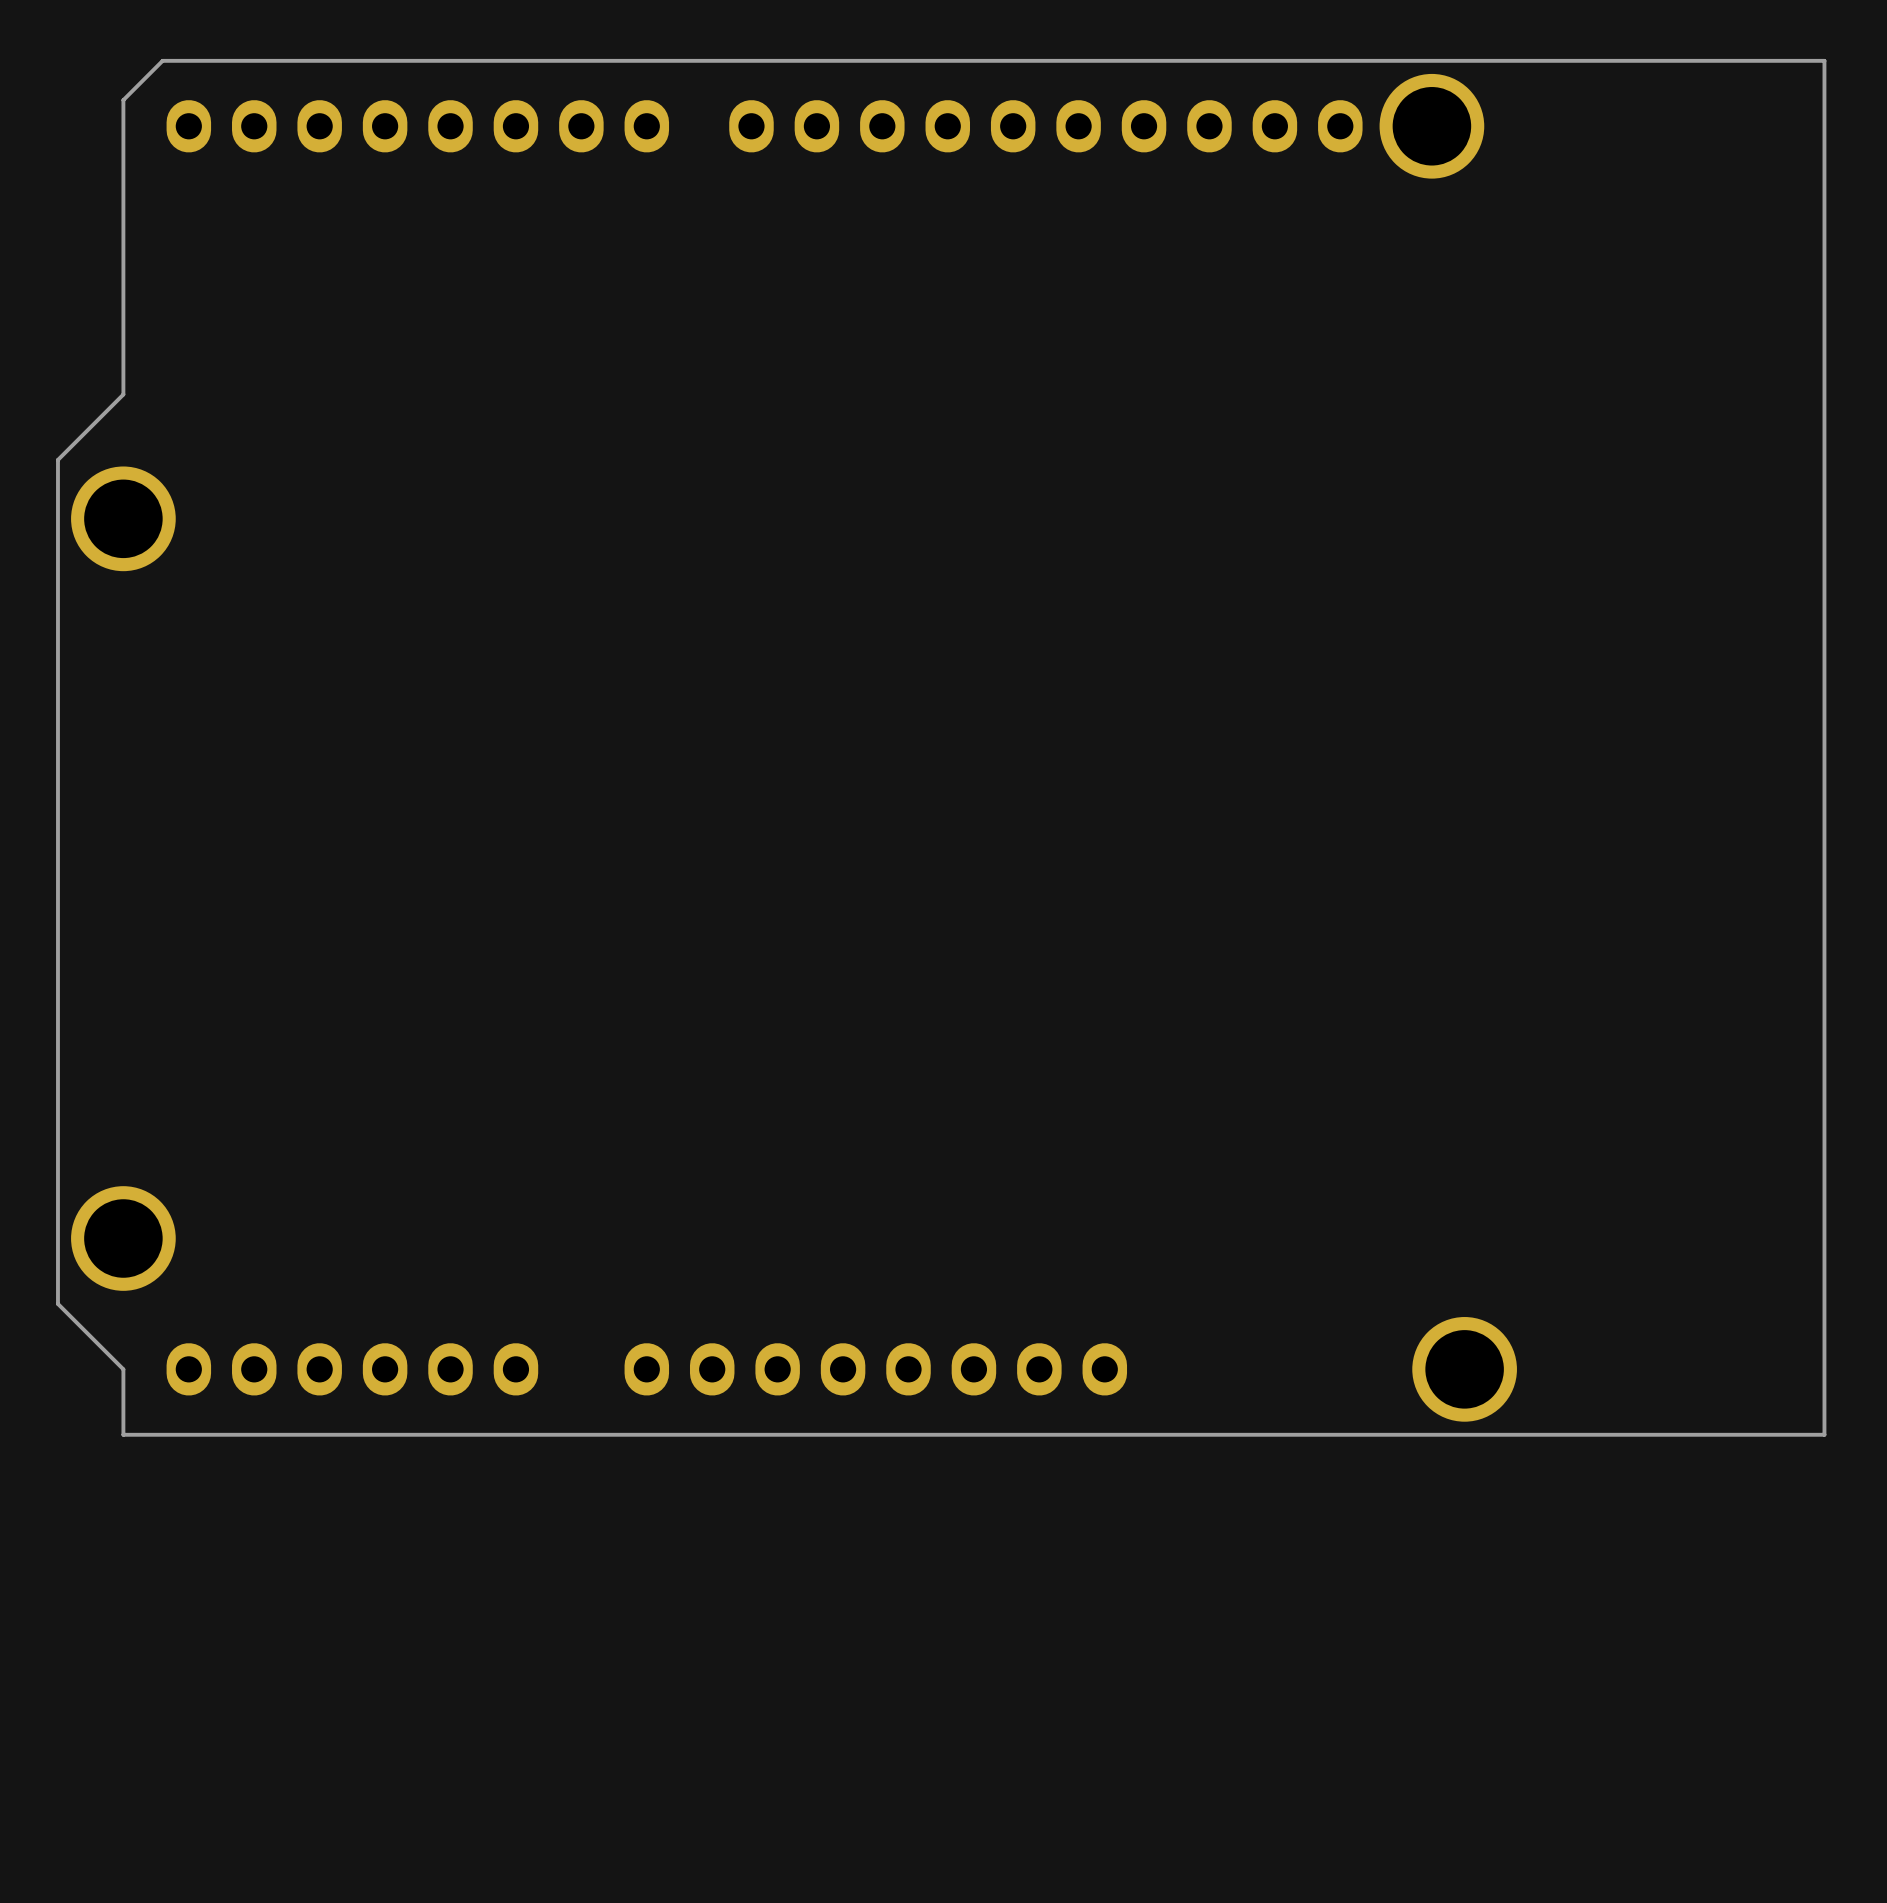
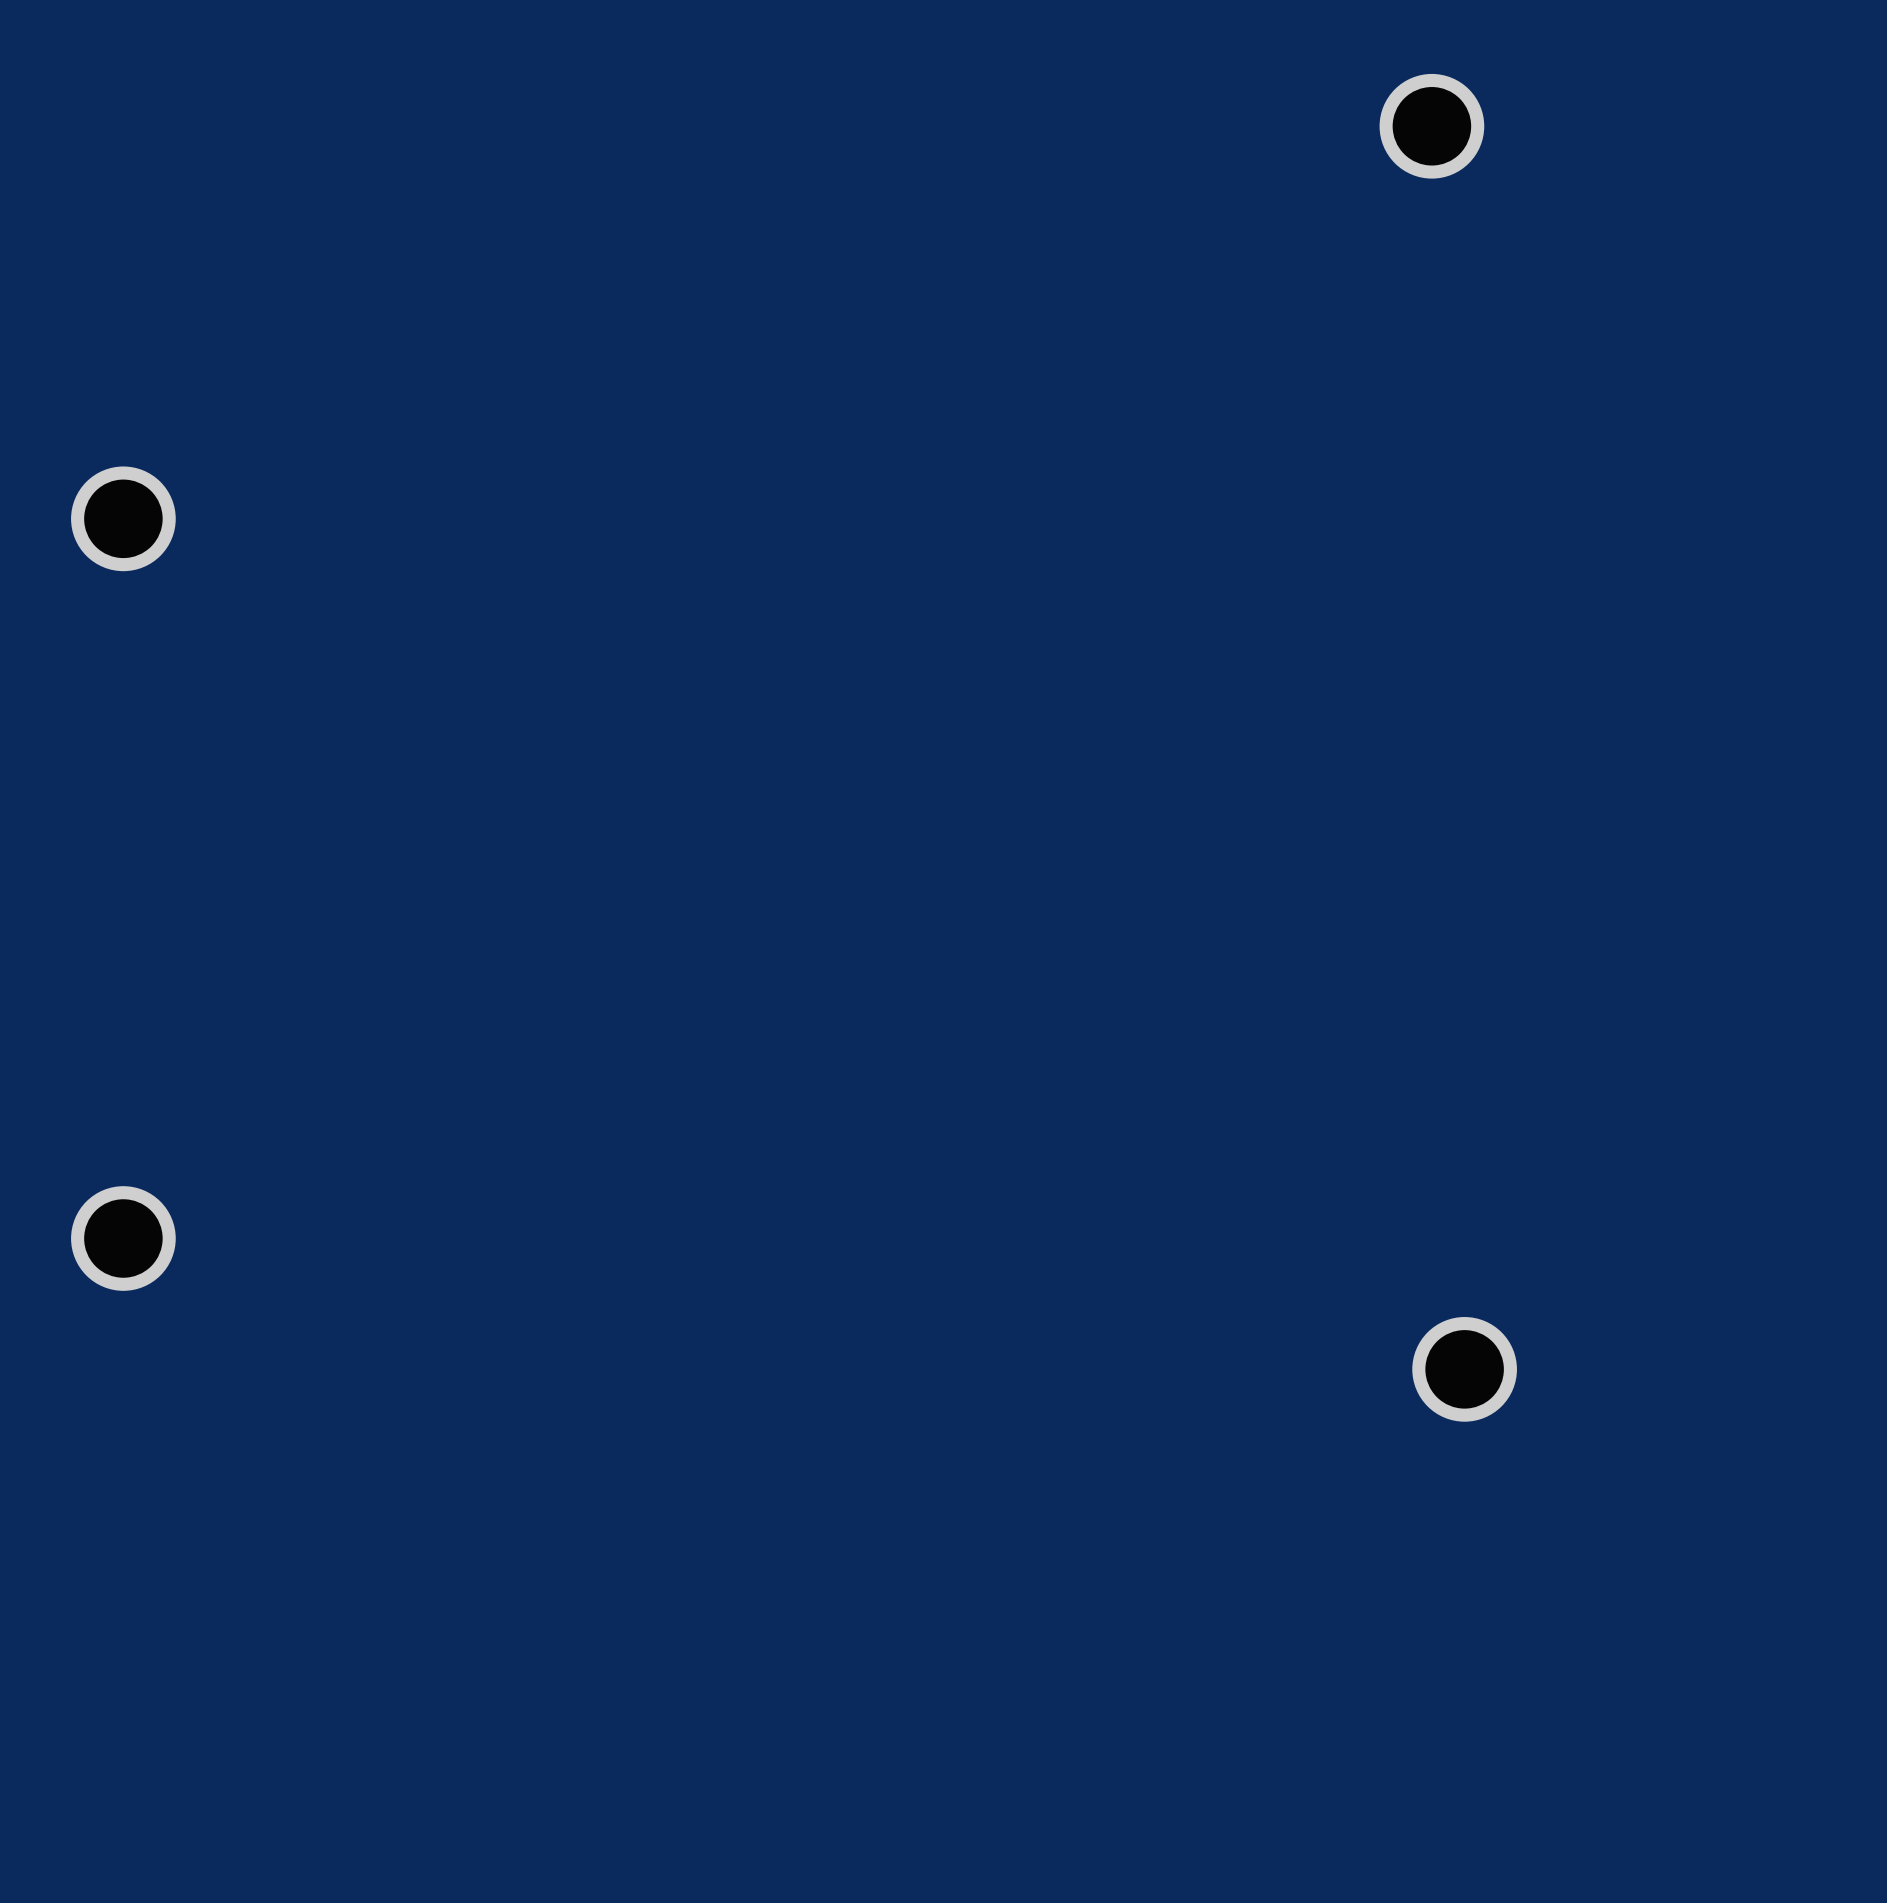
board edge: (1824, 60) (1824, 1434) (123, 1434) (123, 1369) (57, 1303) (57, 459) (123, 394) (123, 100) (162, 60) (1824, 60) -> none
part: (417, 126) -> none
part: (1045, 126) -> none
part: (352, 1369) -> none
part: (875, 1369) -> none

